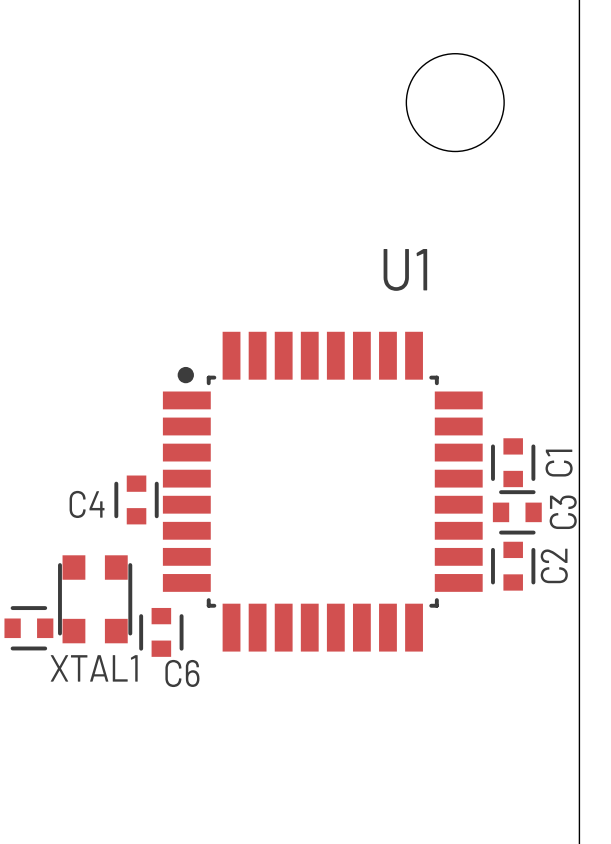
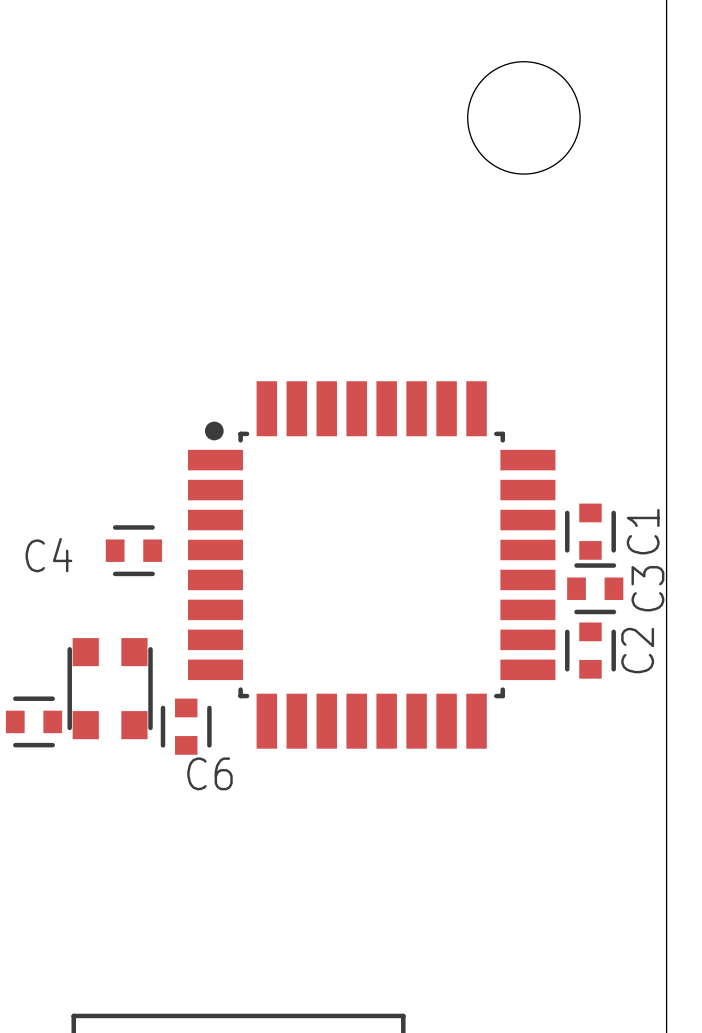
U1 name: U1 (405, 269) -> none
C4 rotation: 0° (136, 499) -> 90° clockwise (133, 550)
XTAL1 name: XTAL1 (94, 668) -> none

